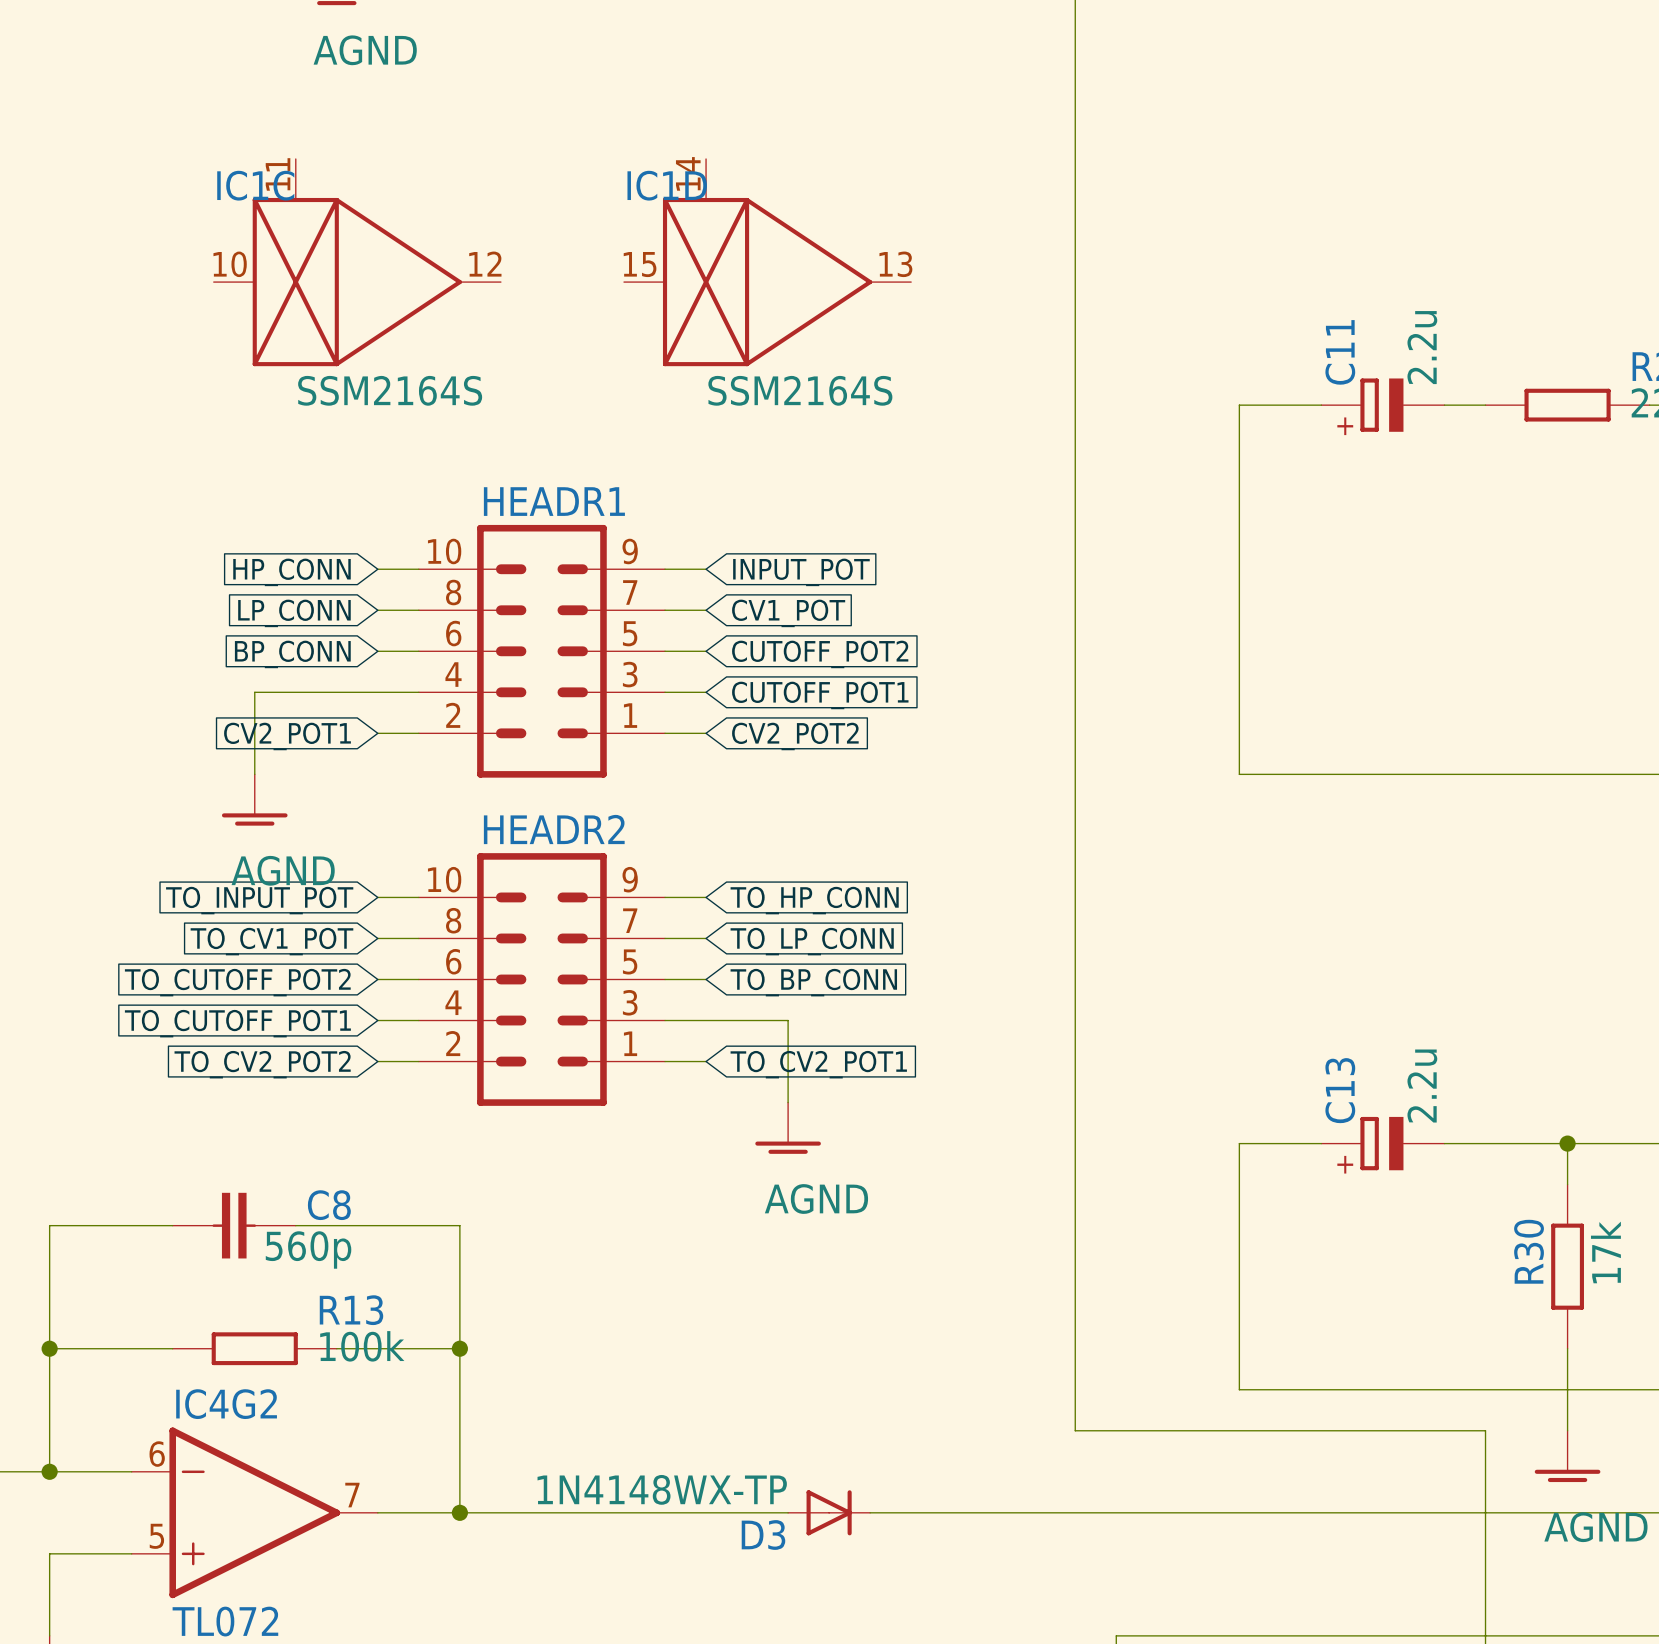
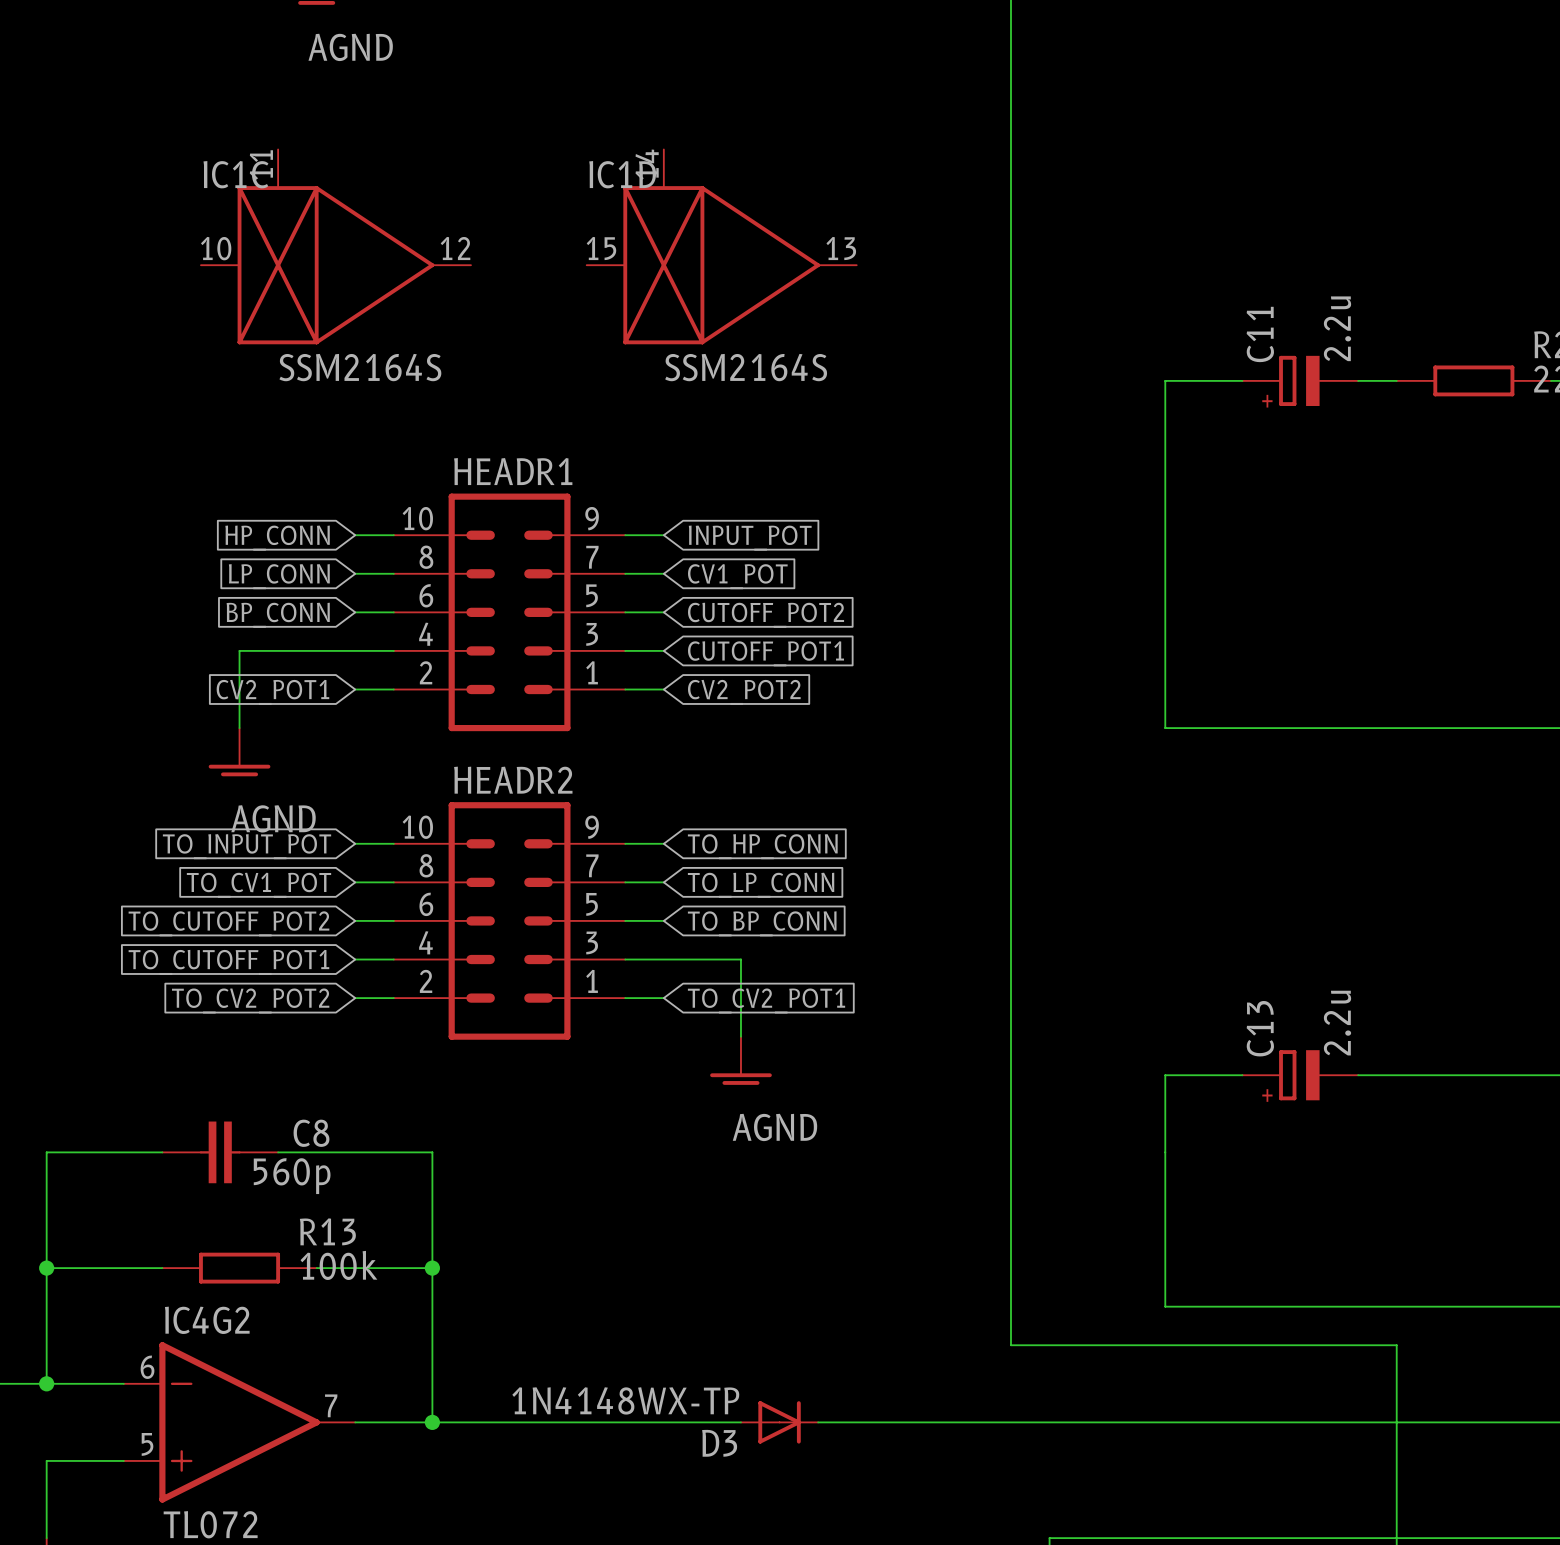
wire: (1567, 1143) (1567, 1184) -> none
junction: (1567, 1143) -> none
R30: 17k (1567, 1266) -> none
wire: (1567, 1348) (1567, 1430) -> none
power symbol: AGND (1567, 1456) -> none

